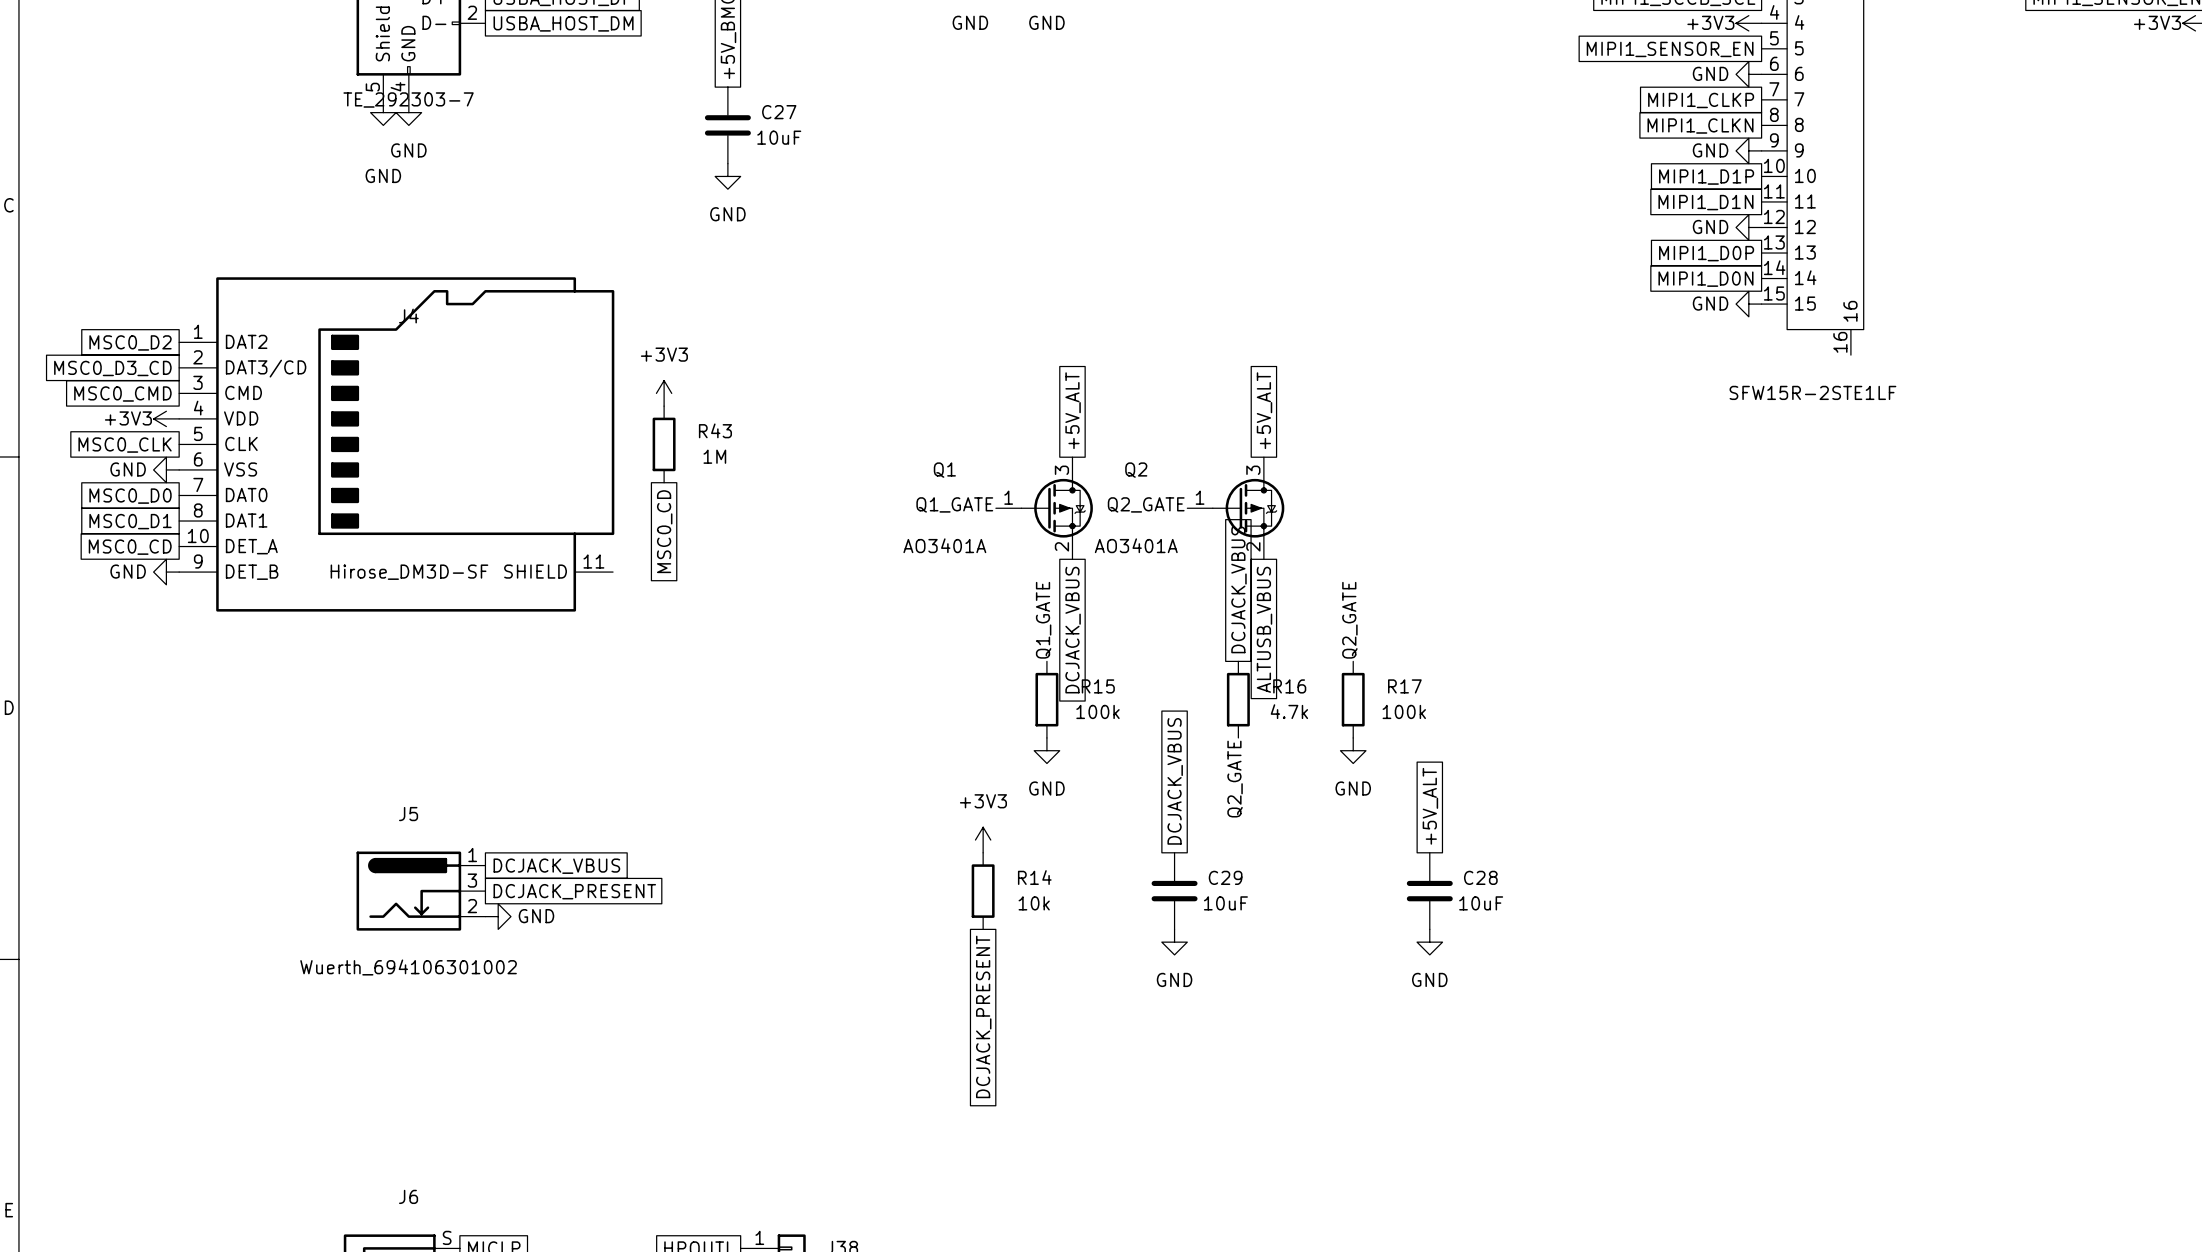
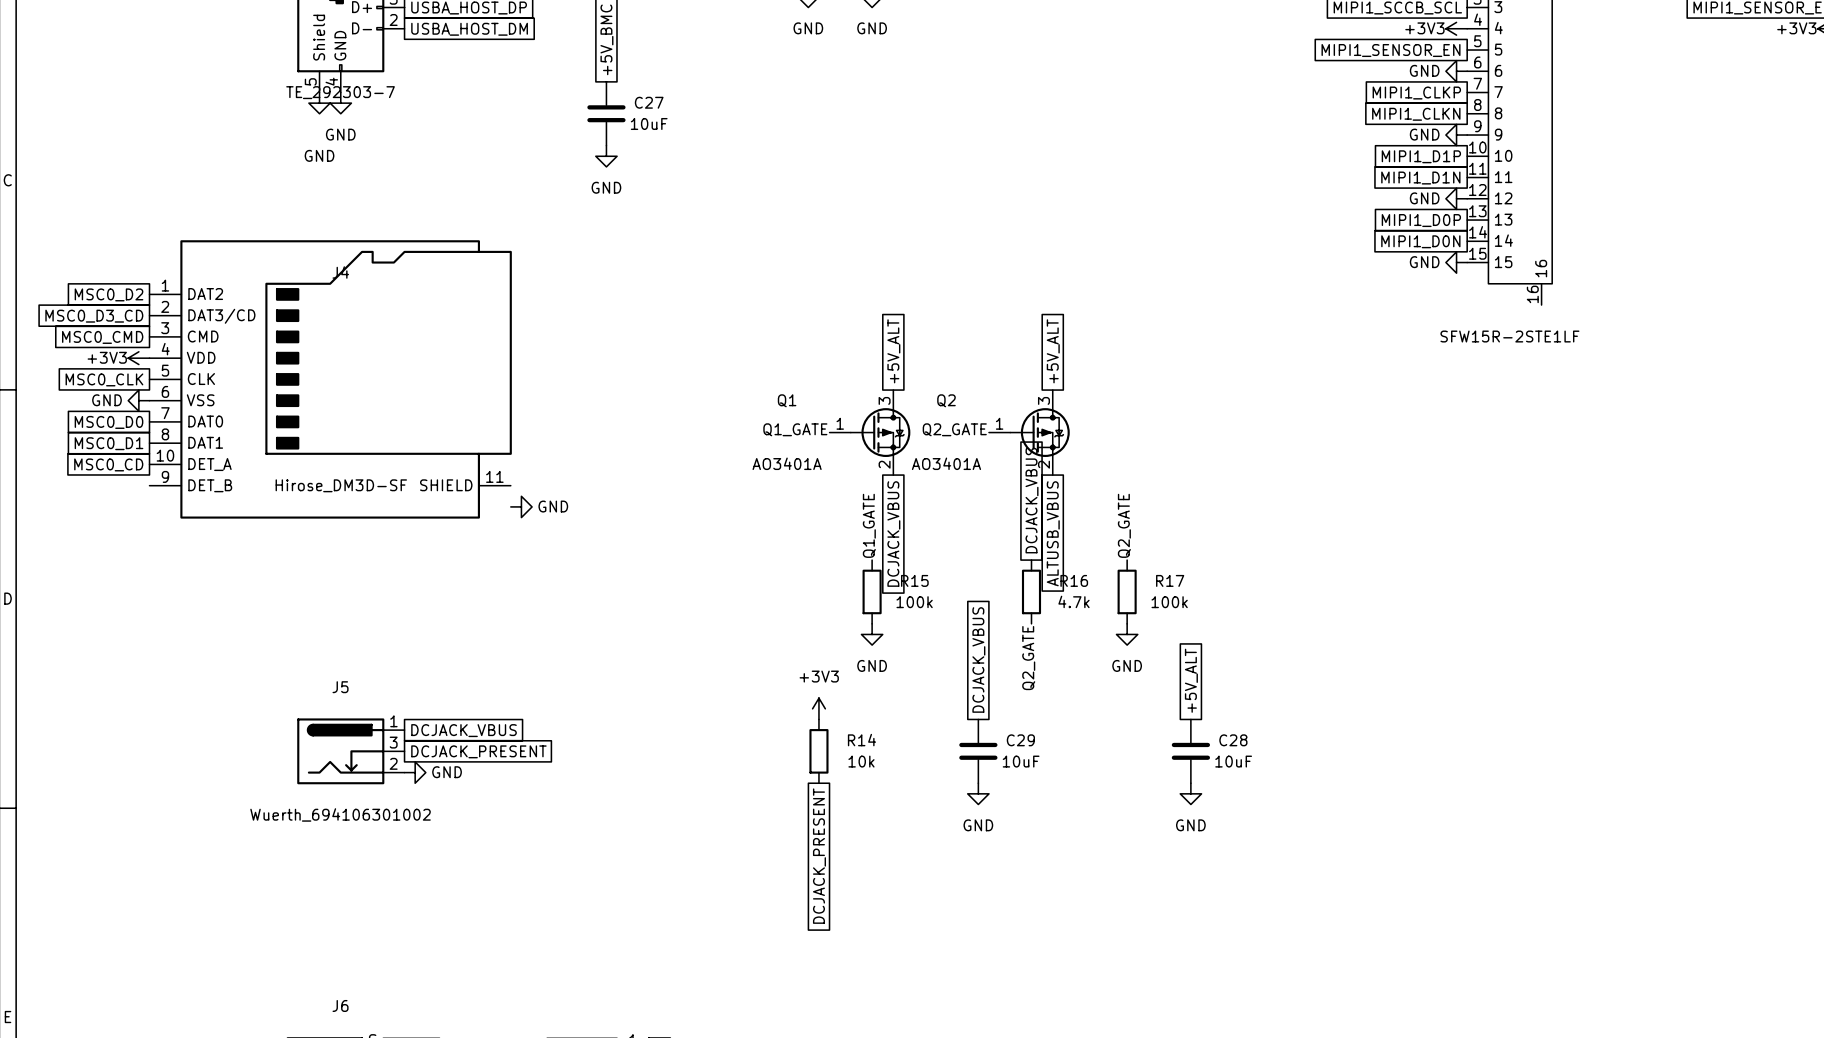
power symbol: +3V3 (664, 393) -> none
R43: 1M (664, 444) -> none
global label: MSC0_CD (664, 531) -> none
power symbol: GND (166, 572) -> none
power symbol: none -> GND (521, 506)

